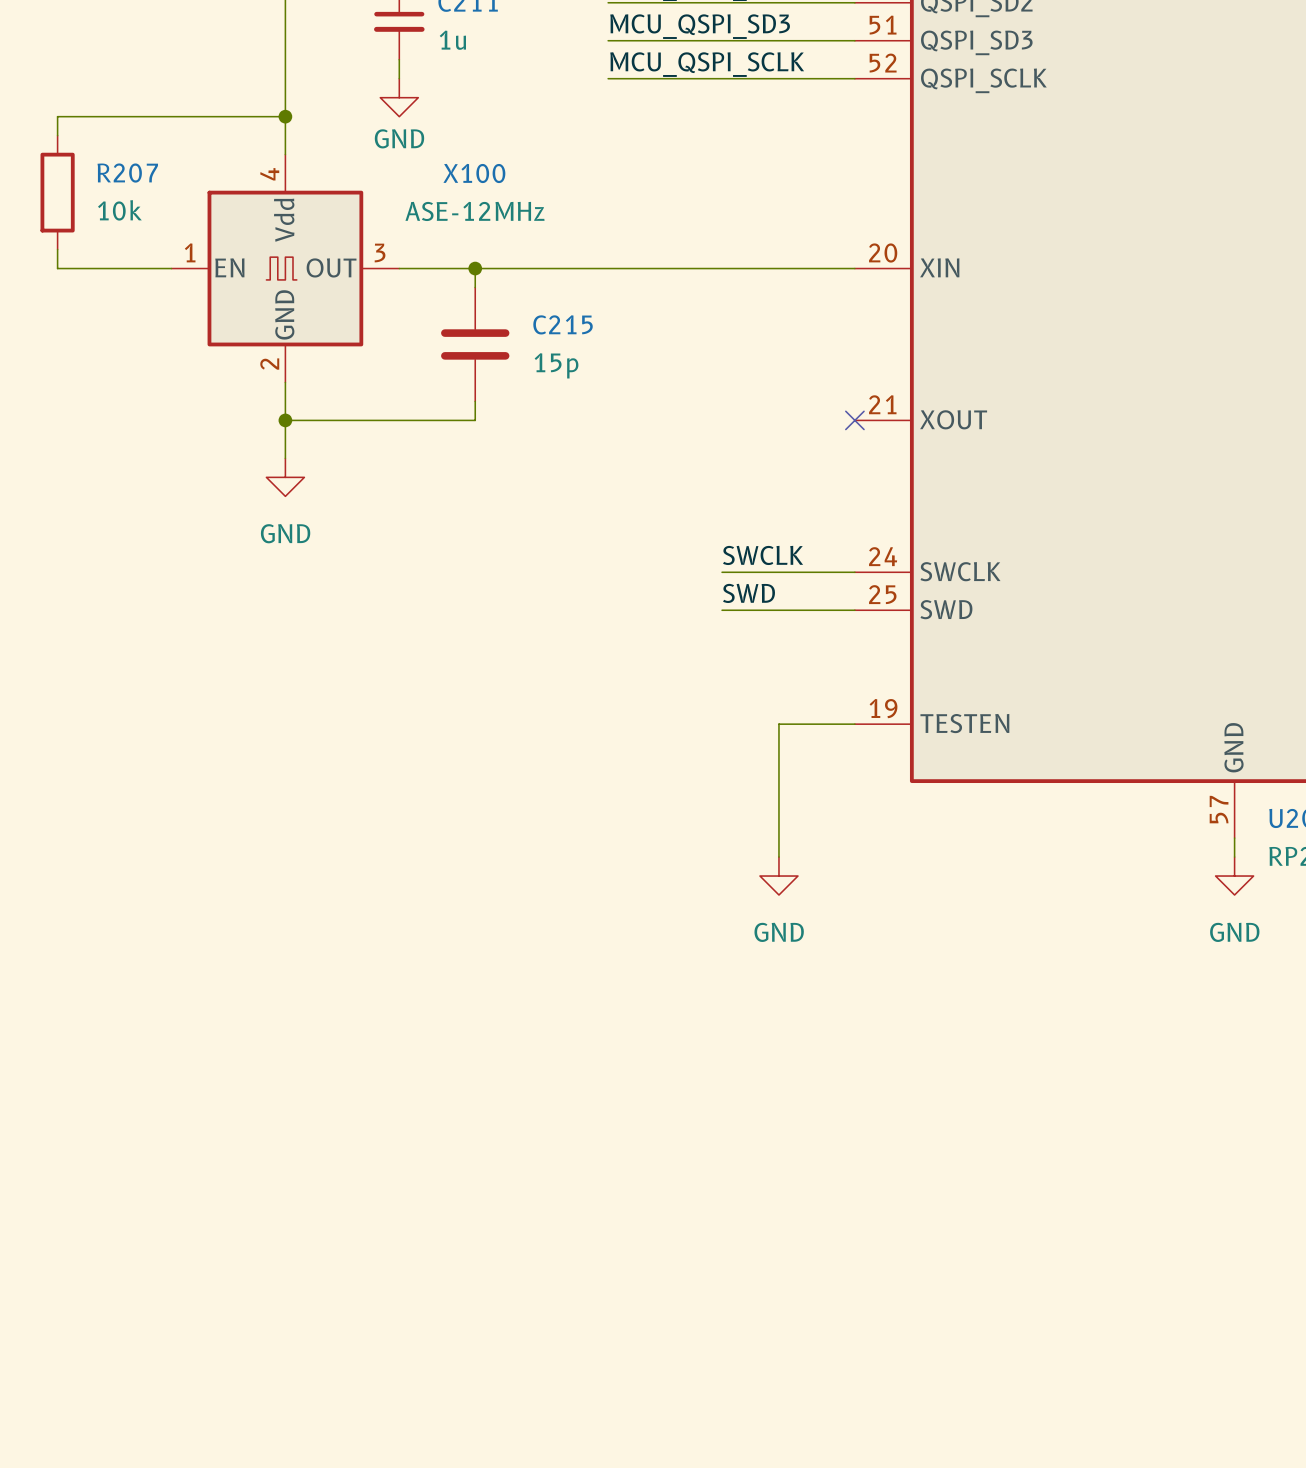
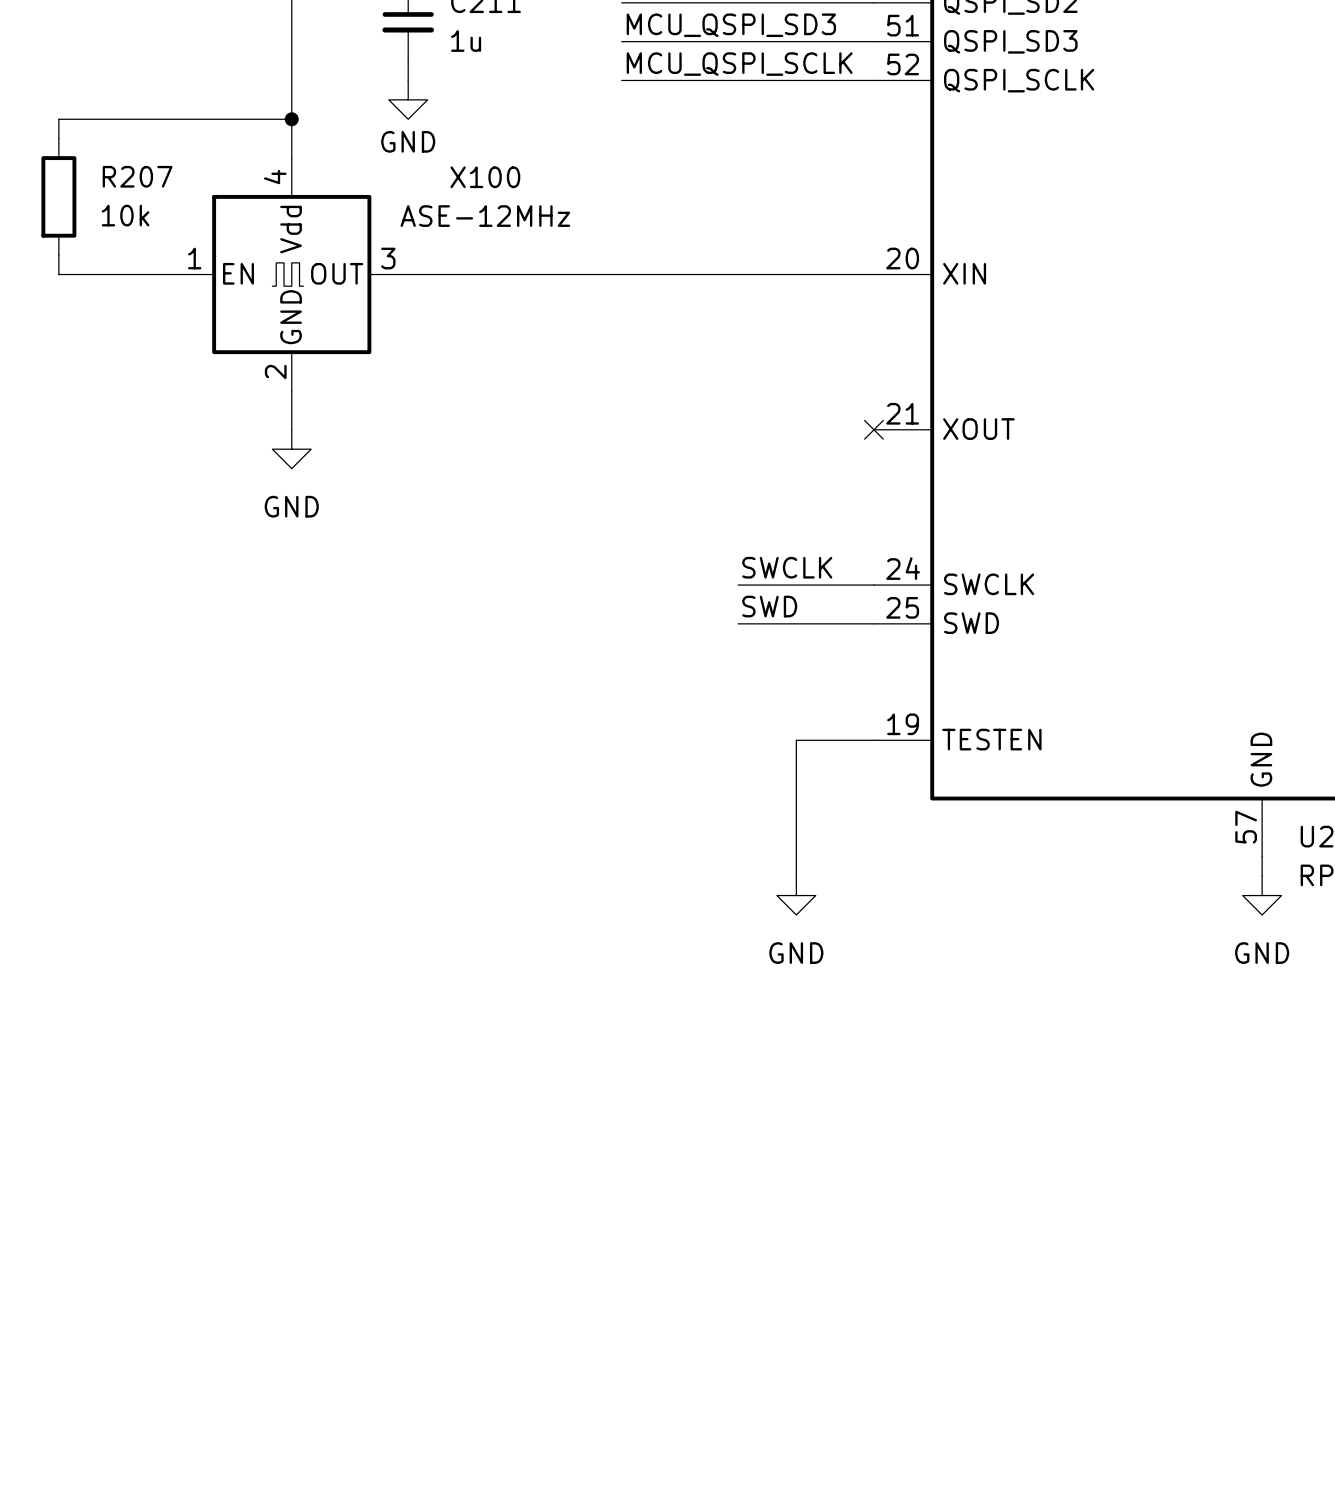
wire: (475, 268) (475, 287) -> none
junction: (475, 268) -> none
C215: 15p (475, 344) -> none
wire: (475, 401) (475, 420) (285, 420) (285, 458) -> none
junction: (285, 420) -> none
power symbol position: GND (285, 477) -> GND (291, 449)

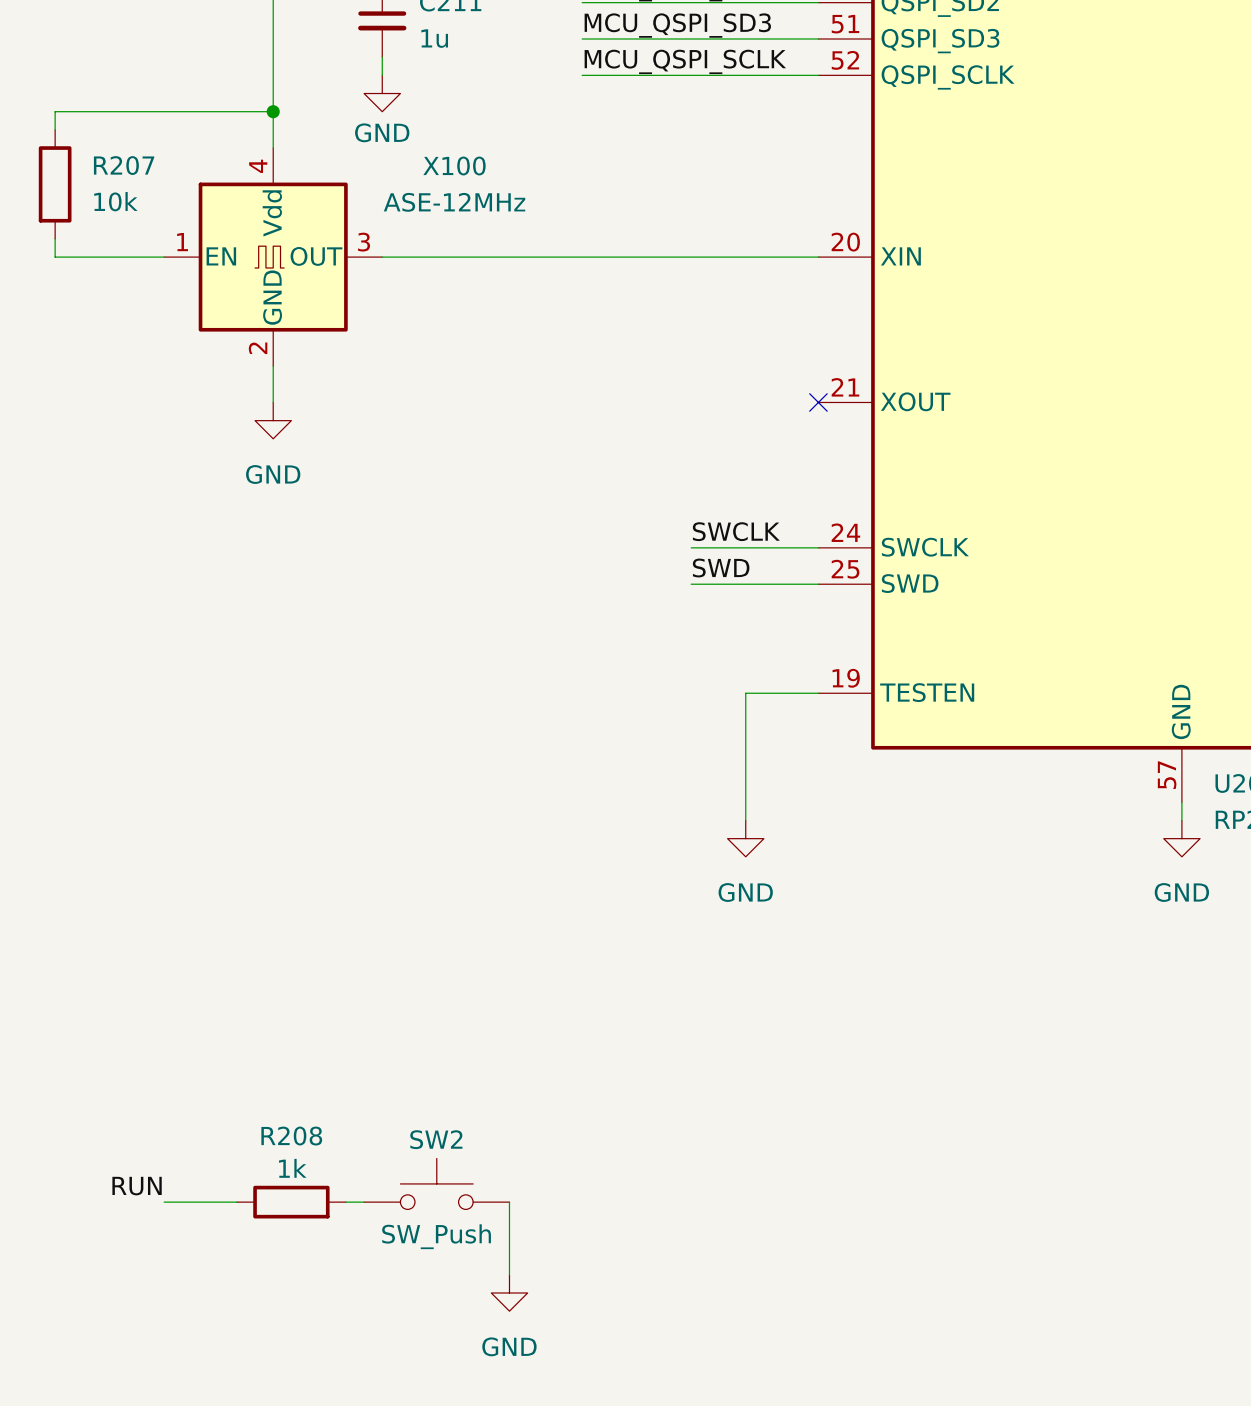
SW2: none -> SW_Push (436, 1183)
label: none -> RUN (137, 1186)
wire: none -> (164, 1202) (236, 1202)
R208: none -> 1k (291, 1202)
wire: none -> (345, 1202) (364, 1202)
wire: none -> (509, 1202) (509, 1274)
power symbol: none -> GND (509, 1292)

